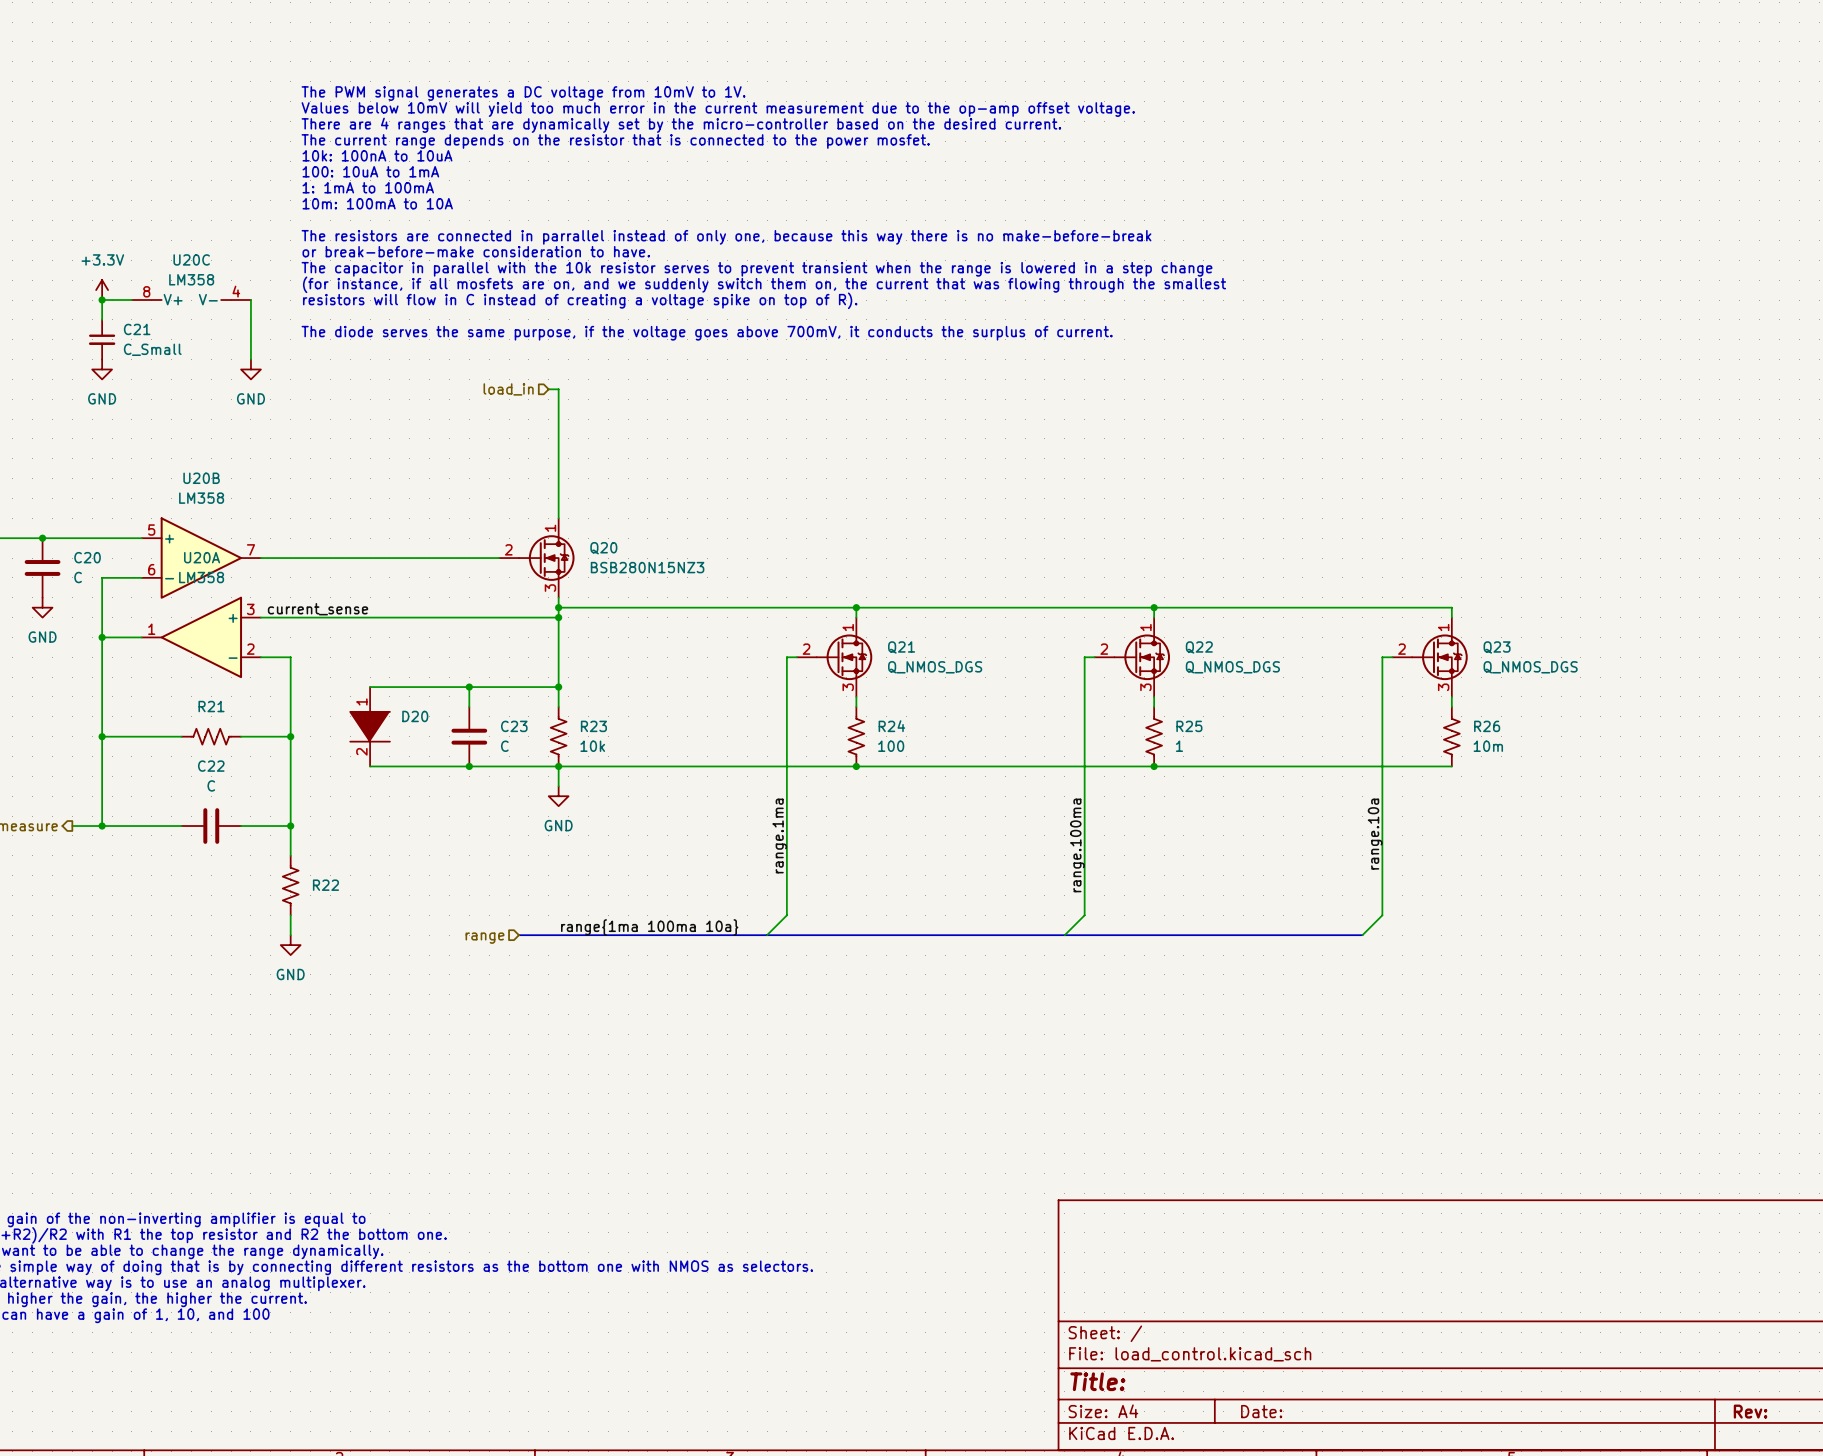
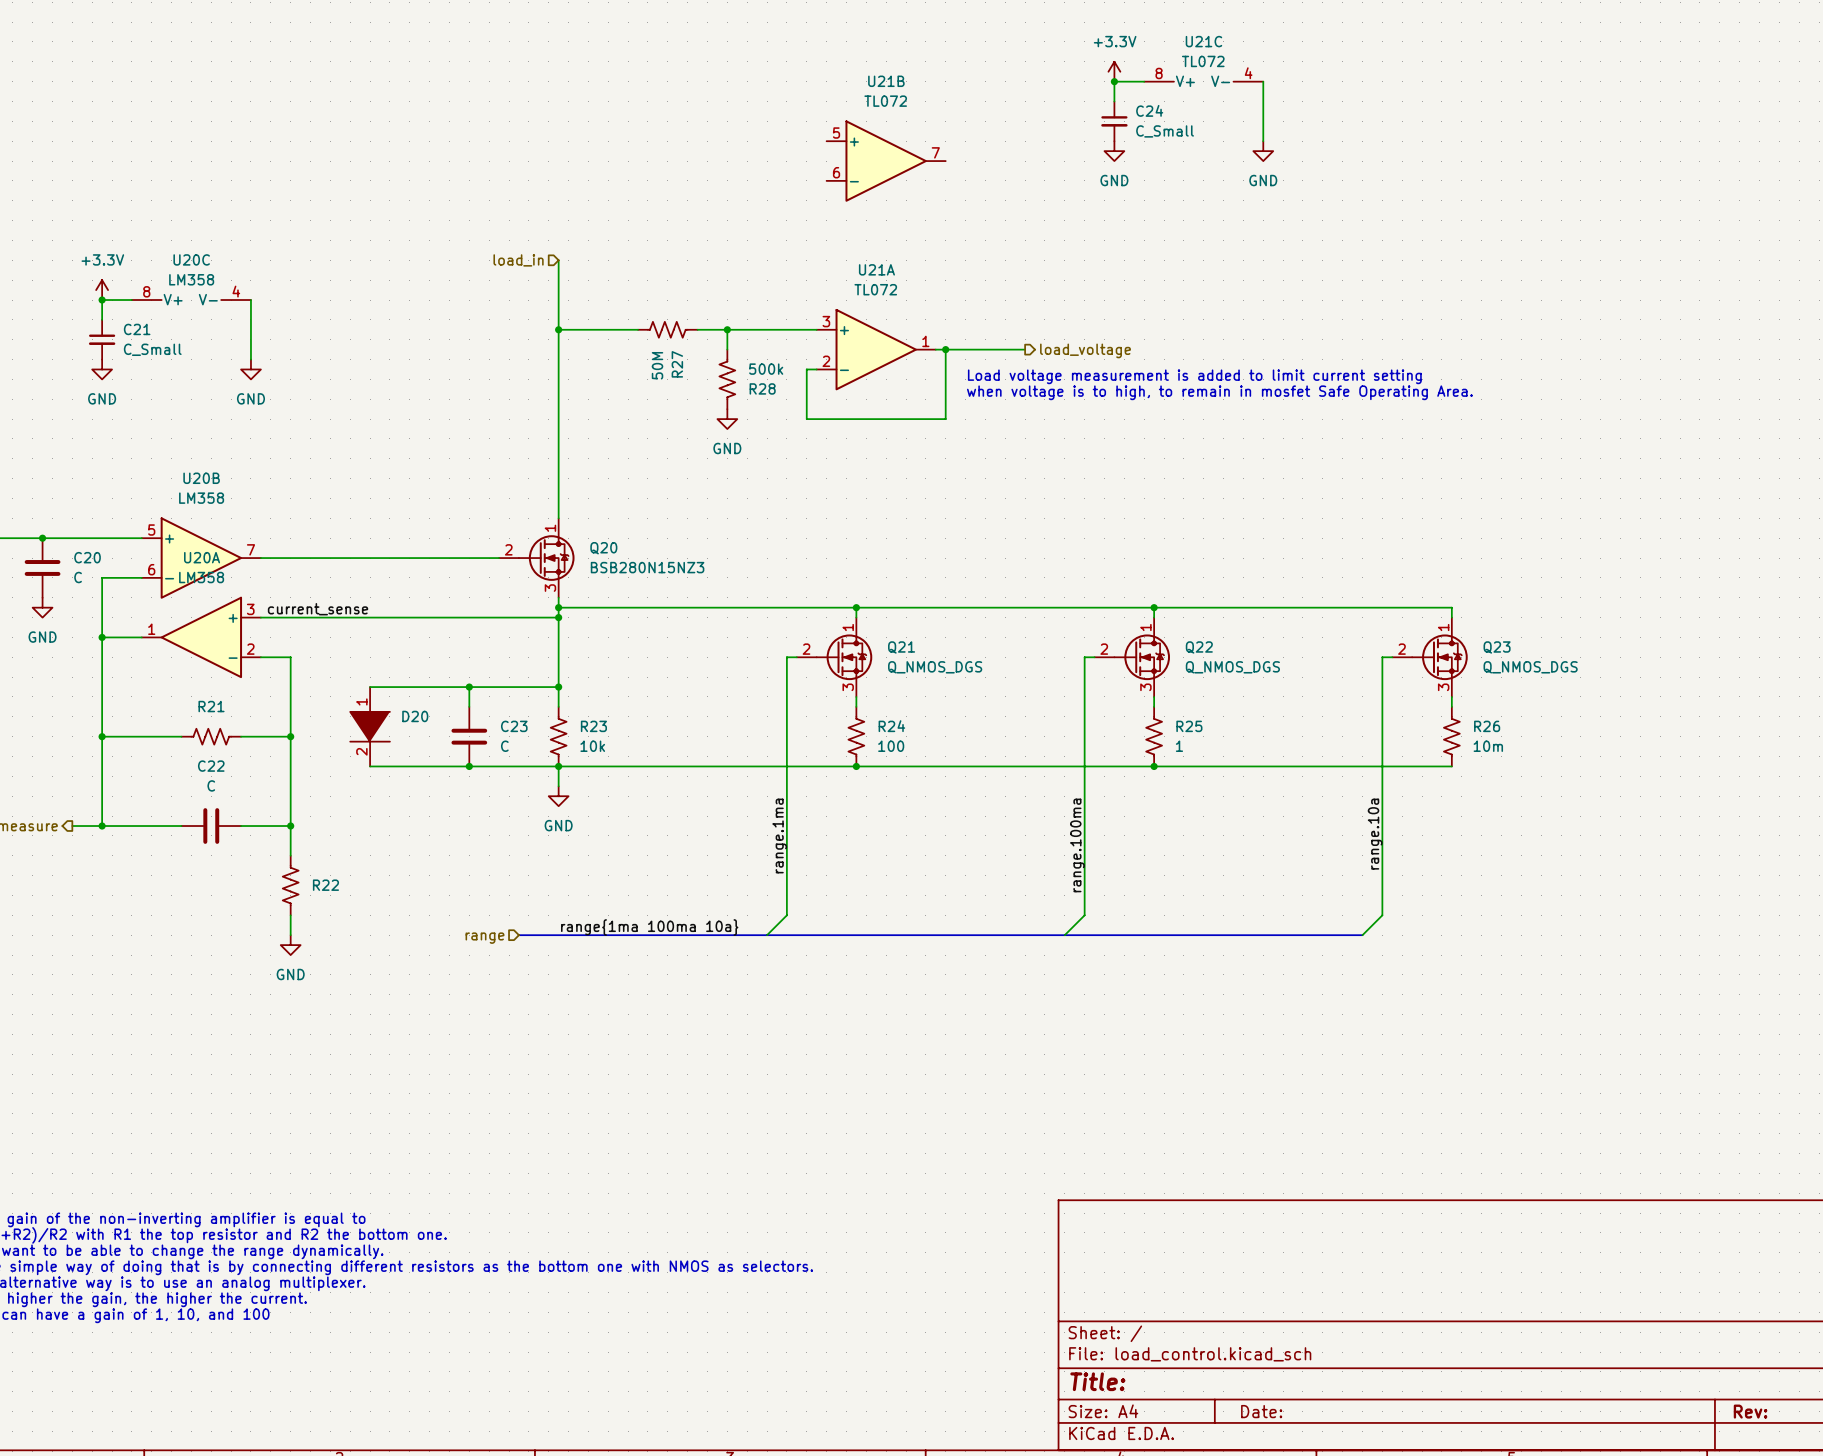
power symbol: none -> +3.3V (1114, 71)
junction: none -> (1114, 81)
wire: none -> (1144, 81) (1114, 81) (1114, 101)
U21C: none -> TL072 (1203, 81)
wire: none -> (1263, 81) (1263, 141)
text: The PWM signal generates a DC voltage from 10mV to 1V. (523, 93) -> none
text: Values below 10mV will yield too much error in the current measurement due to the op-amp offset voltage. (718, 109) -> none
C24: none -> C_Small (1114, 121)
text: There are 4 ranges that are dynamically set by the micro-controller based on the desired current. (681, 125) -> none
text: The current range depends on the resistor that is connected to the power mosfet. (615, 141) -> none
power symbol: none -> GND (1114, 151)
power symbol: none -> GND (1263, 151)
text: 10k: 100nA to 10uA (377, 155) -> none
U21B: none -> TL072 (886, 161)
text: 100: 10uA to 1mA (370, 171) -> none
text: 1: 1mA to 100mA (368, 187) -> none
text: 10m: 100mA to 10A (377, 203) -> none
text: The resistors are connected in parrallel instead of only one, because this way there is no make-before-break (726, 237) -> none
text: or break-before-make consideration to have. (476, 251) -> none
text: The capacitor in parallel with the 10k resistor serves to prevent transient when the range is lowered in a step change (756, 269) -> none
text: (for instance, if all mosfets are on, and we suddenly switch them on, the current that was flowing through the smallest (764, 284) -> none
text: resistors will flow in C instead of creating a voltage spike on top of R). (580, 300) -> none
wire: none -> (558, 329) (638, 329)
junction: none -> (558, 329)
R27: none -> 50M (667, 329)
wire: none -> (697, 329) (816, 329)
wire: none -> (727, 329) (727, 349)
junction: none -> (727, 329)
text: The diode serves the same purpose, if the voltage goes above 700mV, it conducts the surplus of current. (707, 333) -> none
U21A: none -> TL072 (876, 349)
wire: none -> (935, 349) (1025, 349)
wire: none -> (945, 349) (945, 419) (806, 419) (806, 369) (816, 369)
junction: none -> (945, 349)
hierarchical label: none -> load_voltage (1085, 350)
text: none -> Load voltage measurement is added to limit current setting (1194, 376)
R28: none -> 500k (727, 379)
hierarchical label position: load_in (508, 389) -> load_in (518, 260)
wire: (548, 389) (558, 389) -> (558, 260) (558, 389)
text: none -> when voltage is to high, to remain in mosfet Safe Operating Area. (1219, 392)
power symbol: none -> GND (727, 419)

